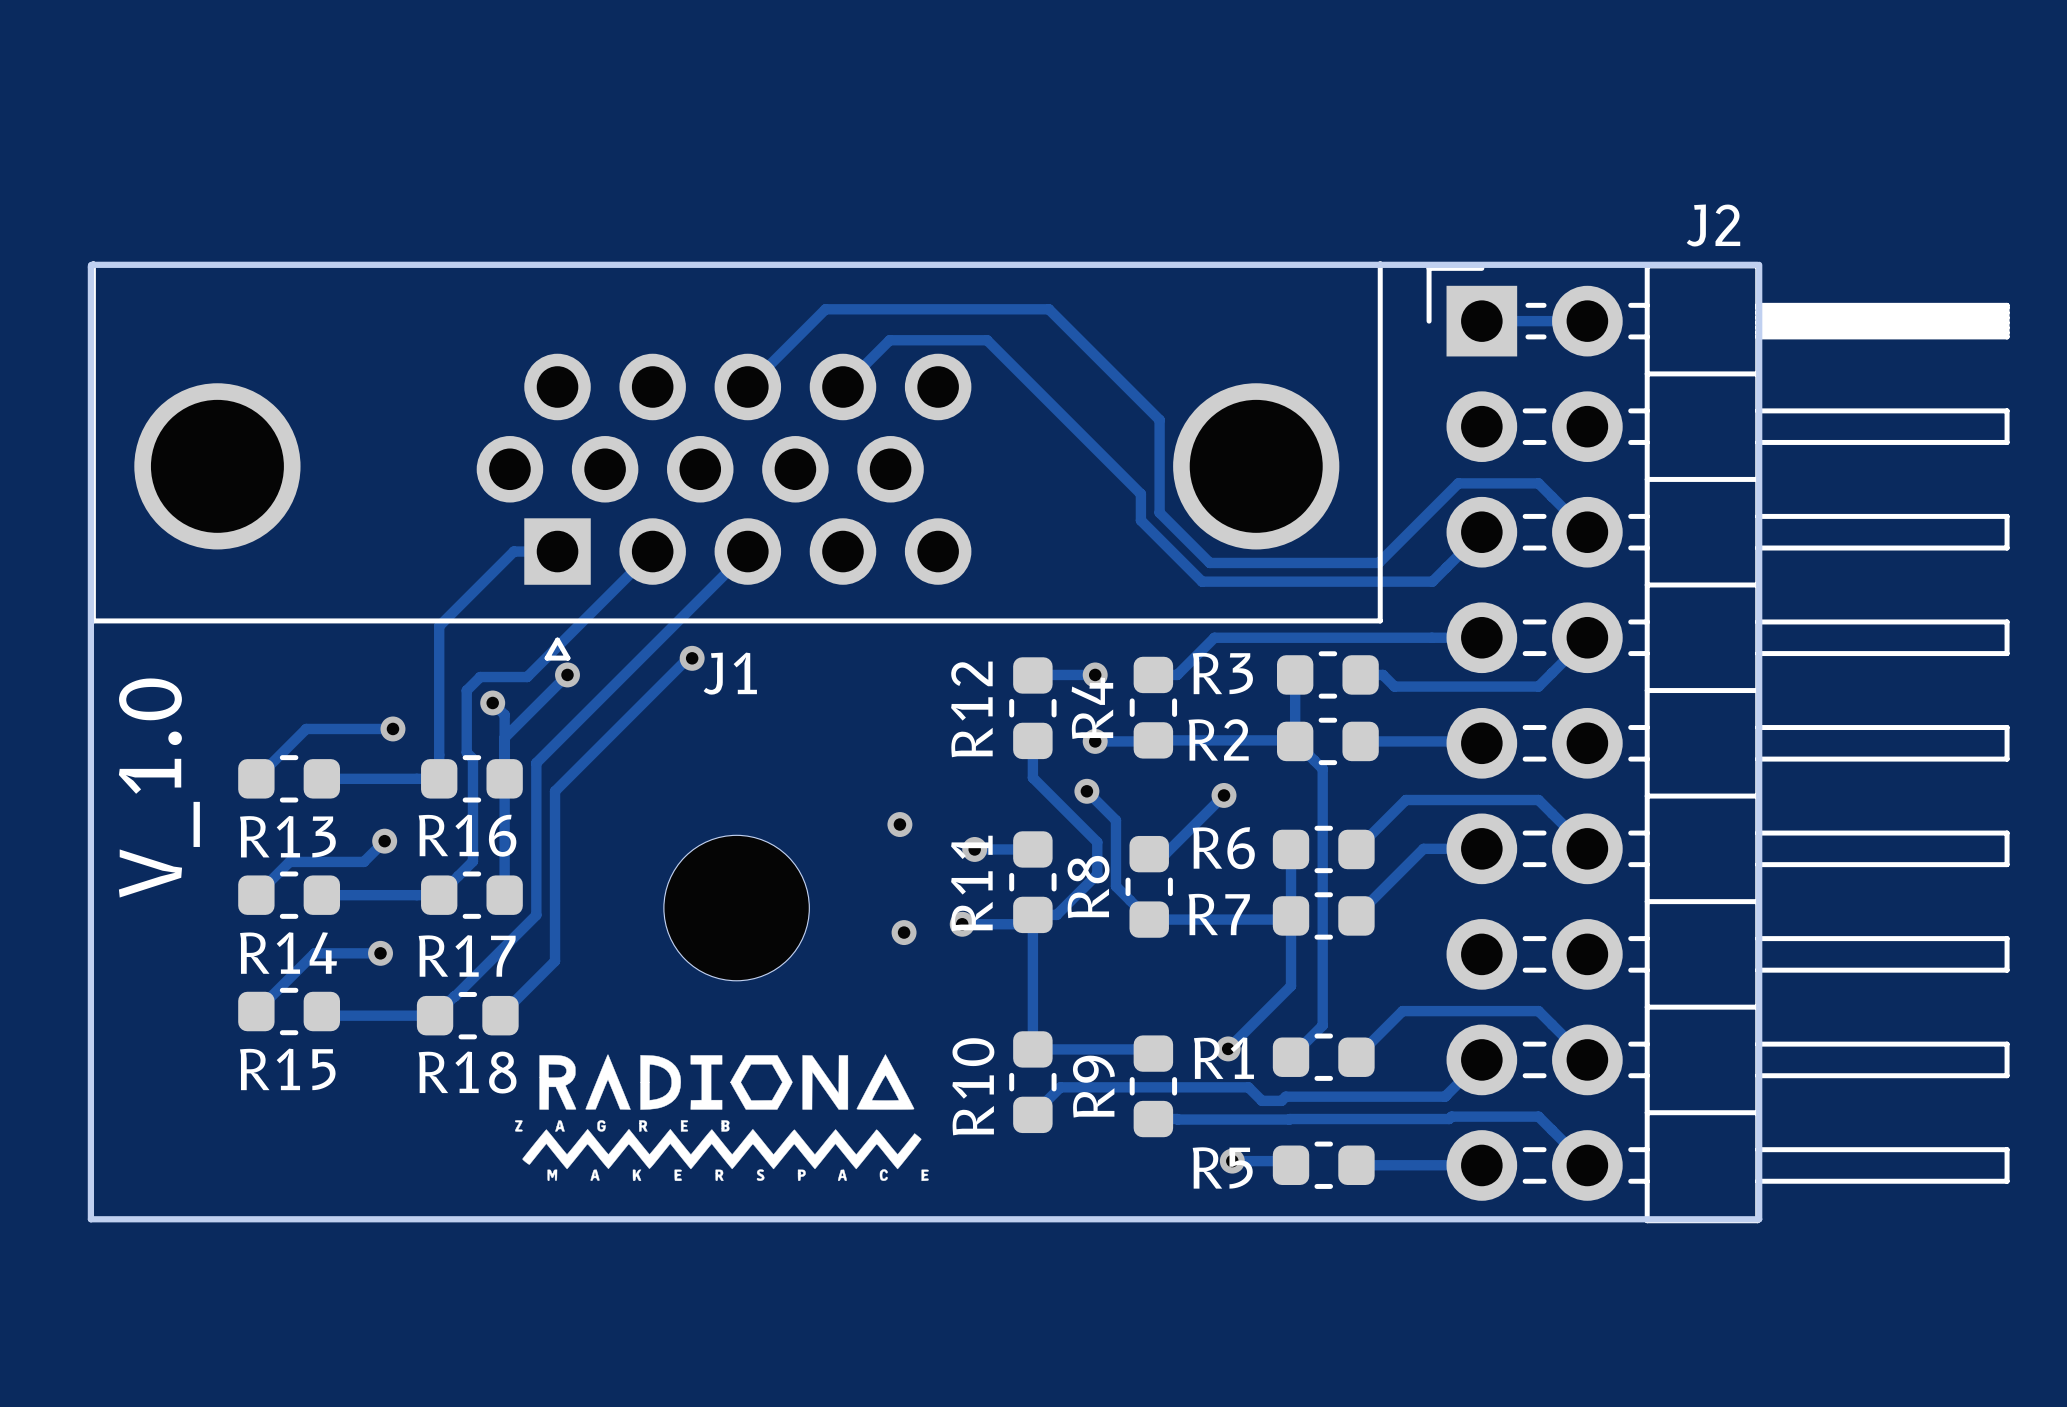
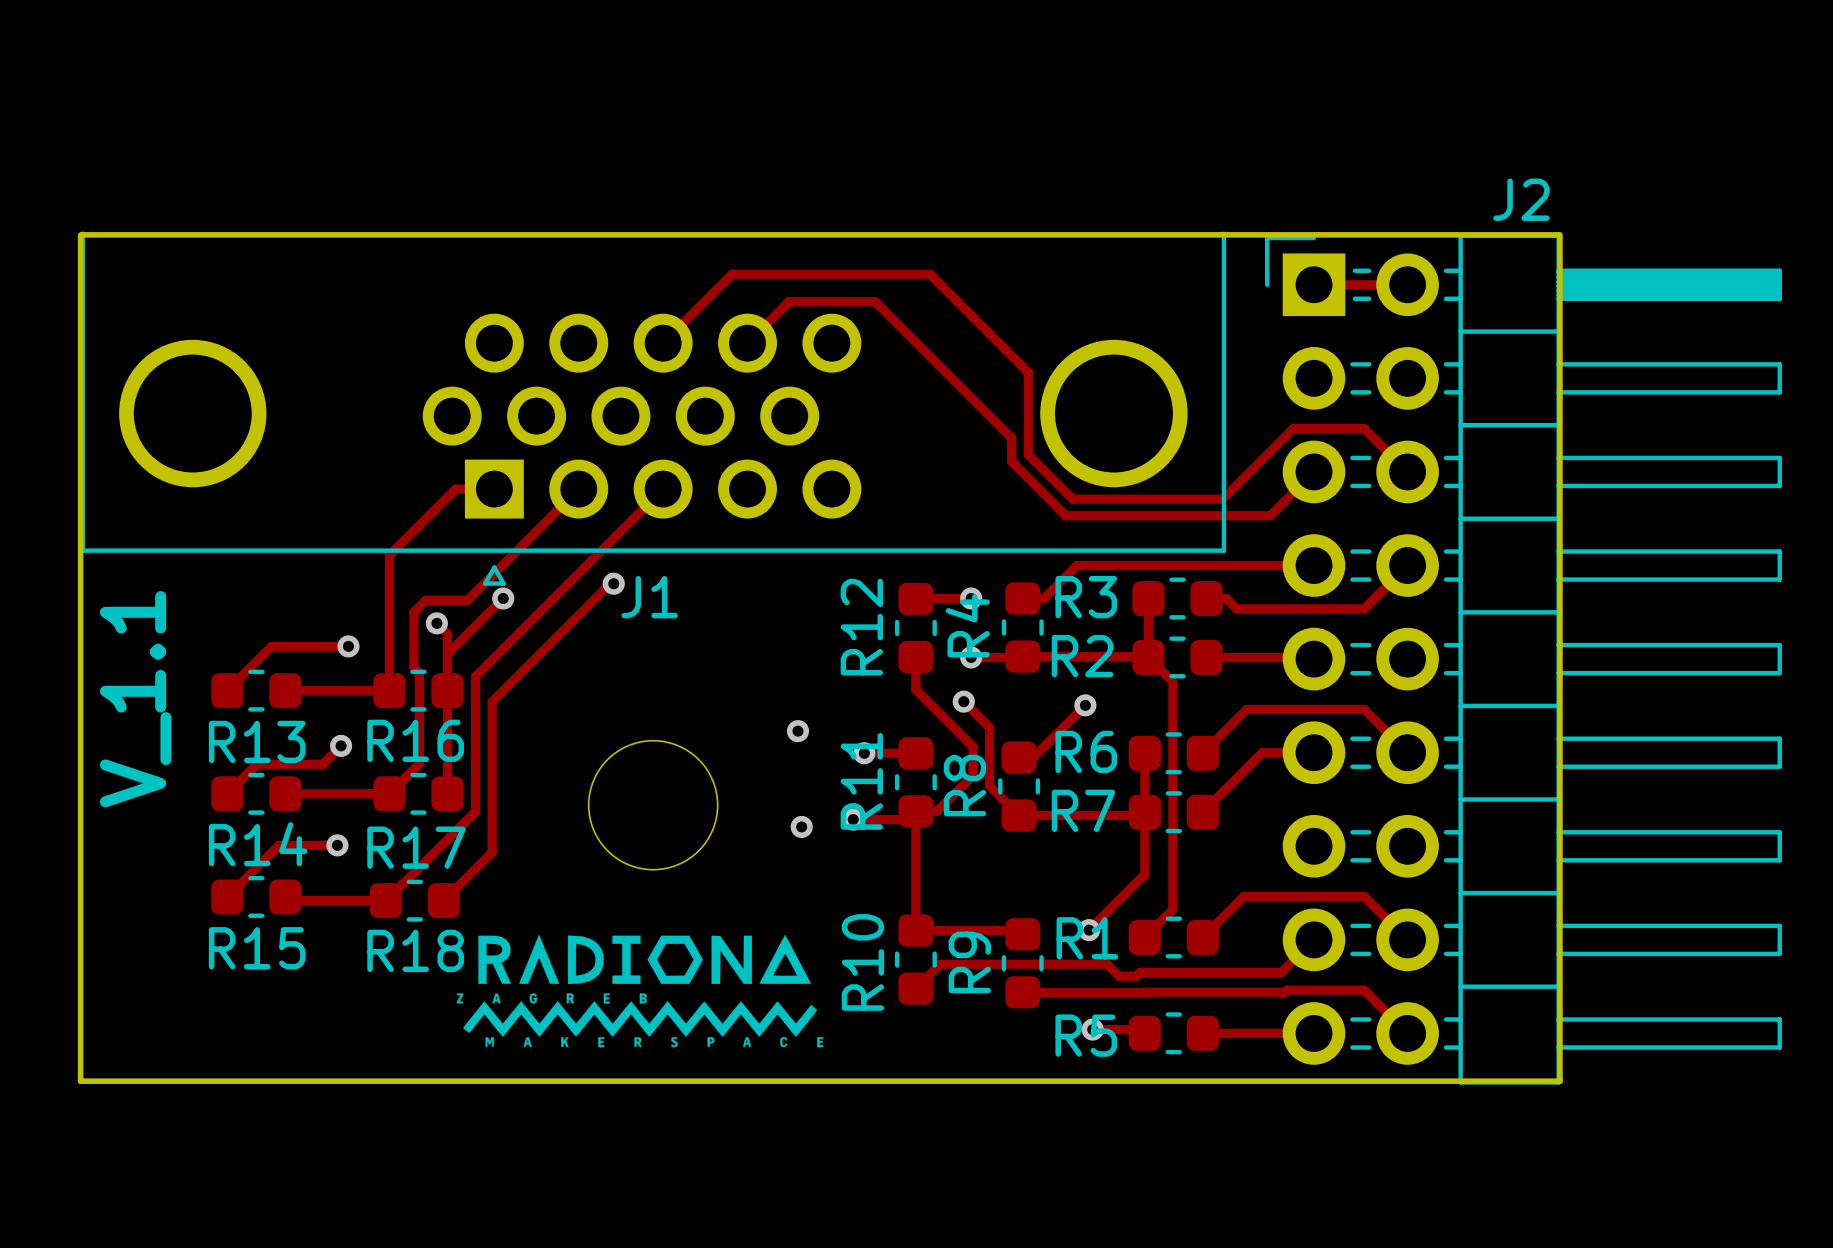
text: V_1.0 (159, 788) -> V_1.1 (135, 699)

